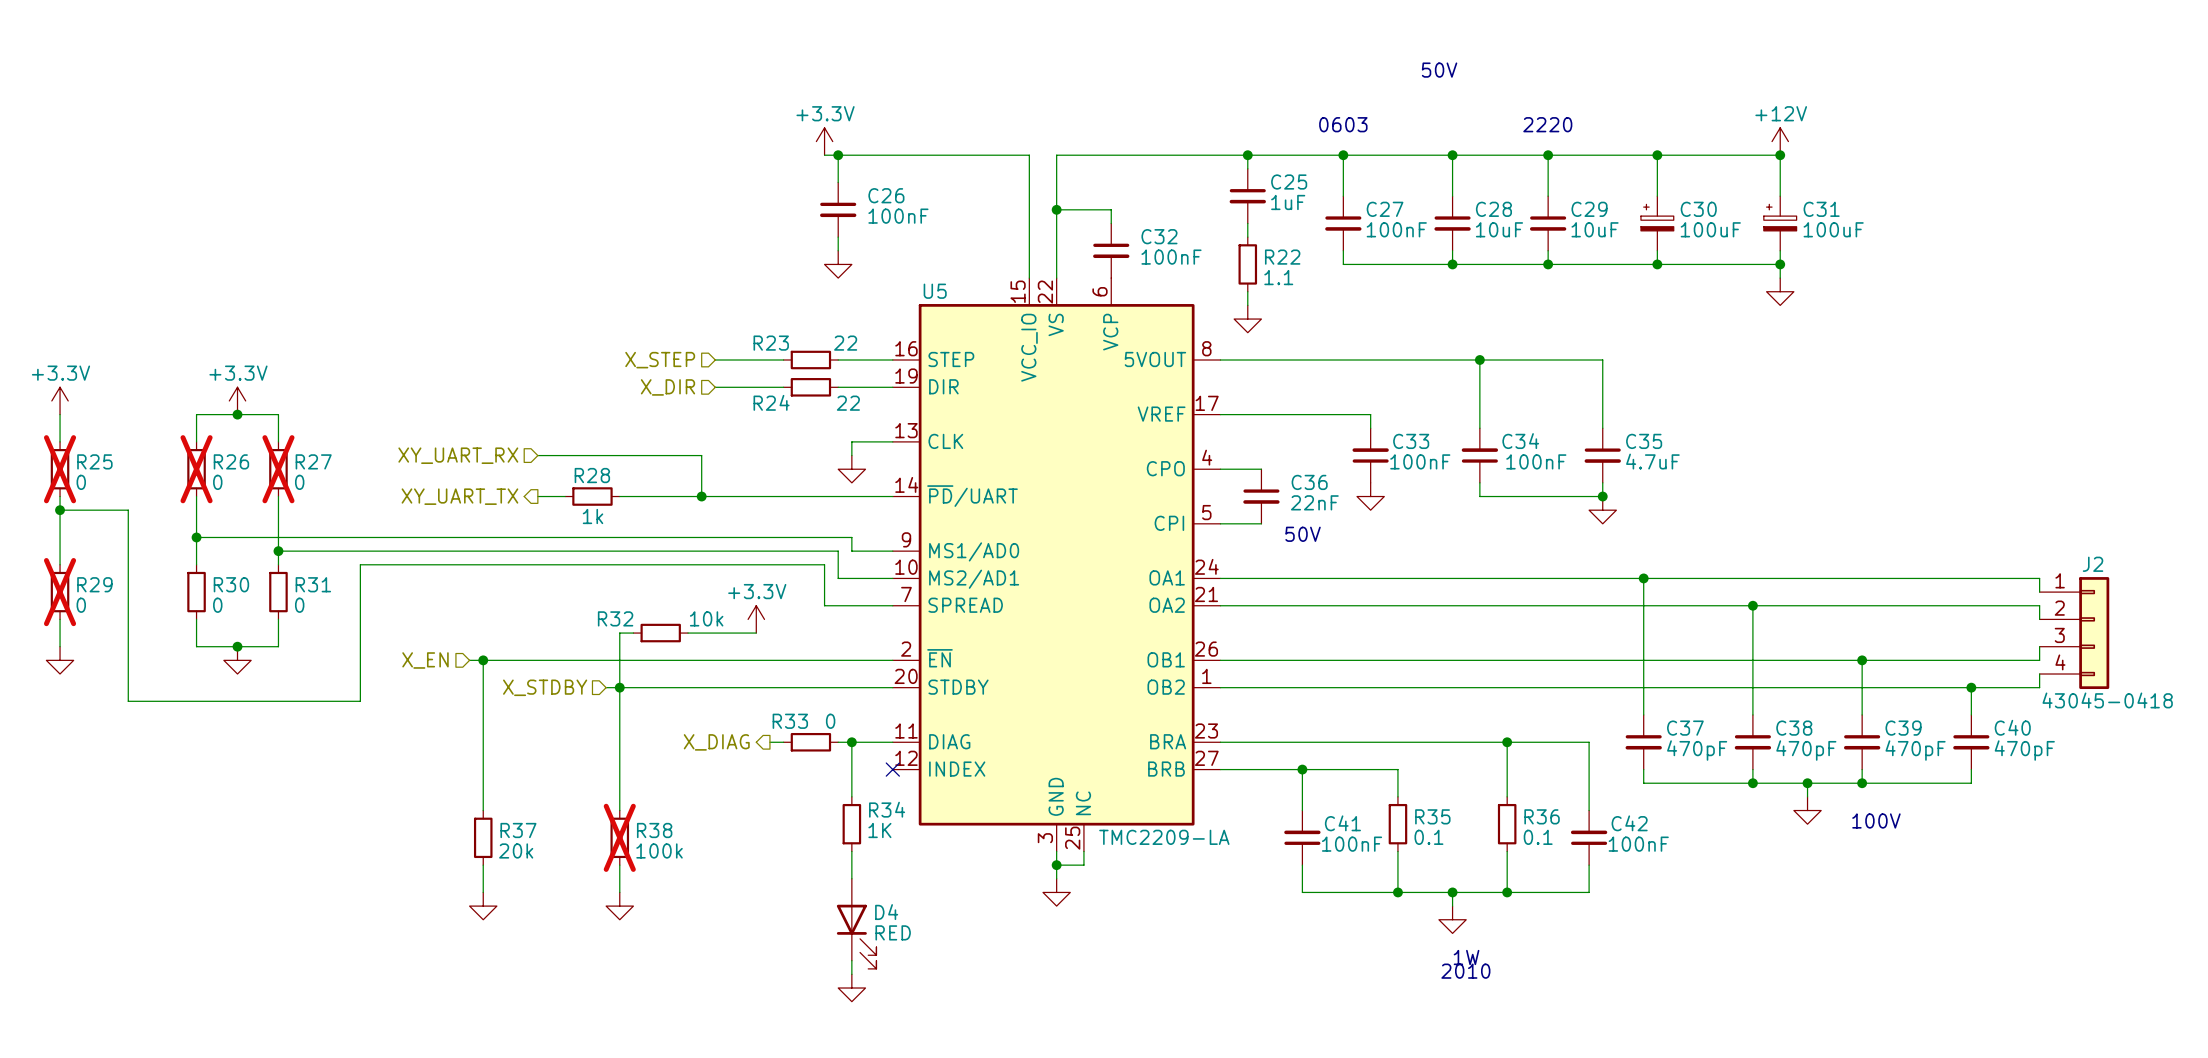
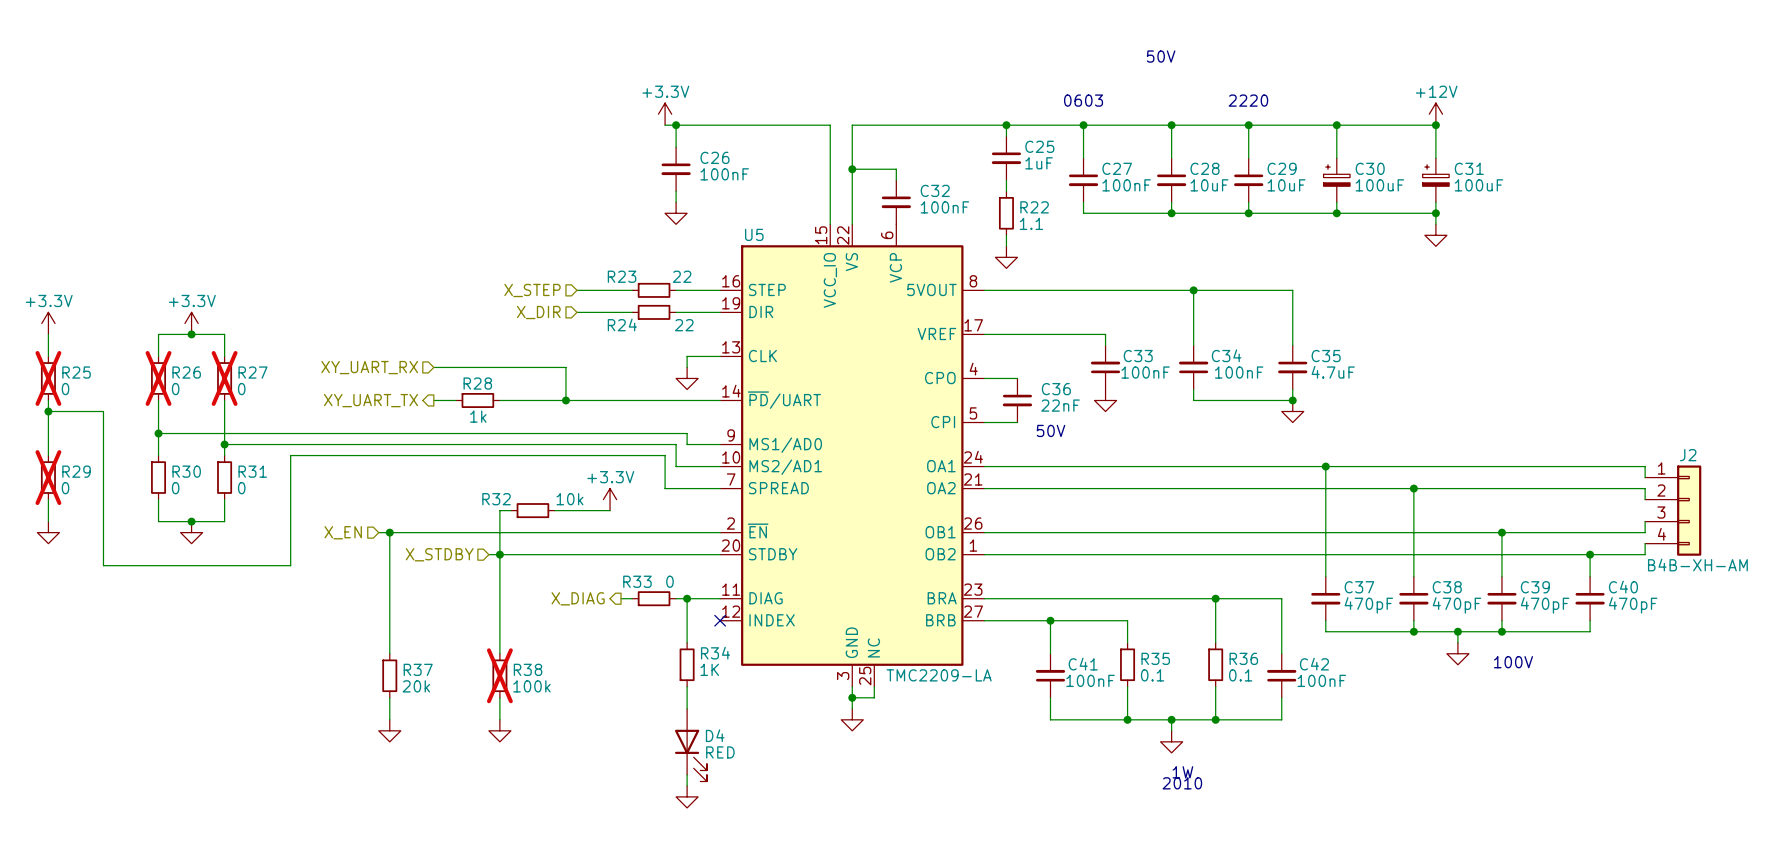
J2 value: 43045-0418 (2107, 700) -> B4B-XH-AM (1697, 564)

